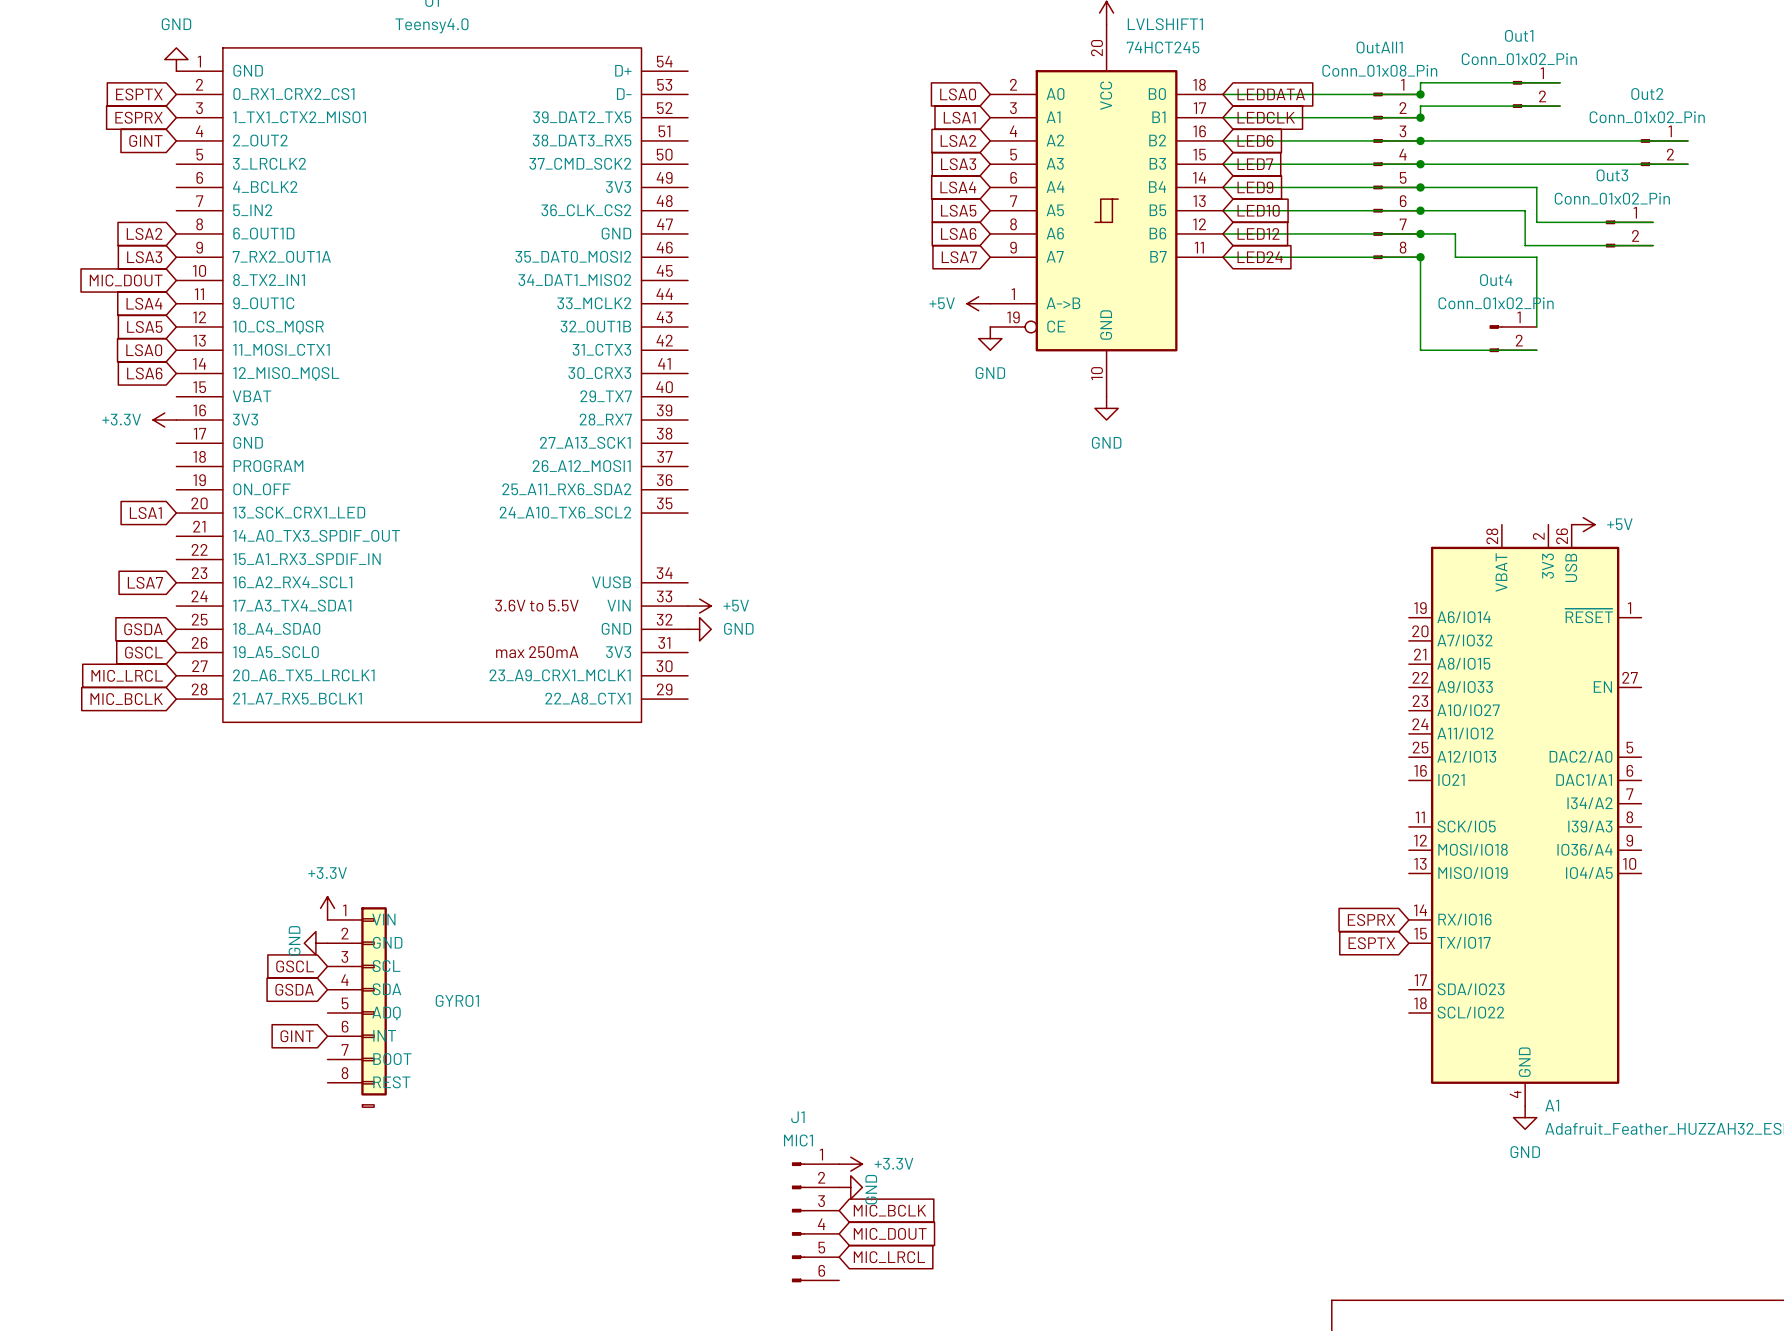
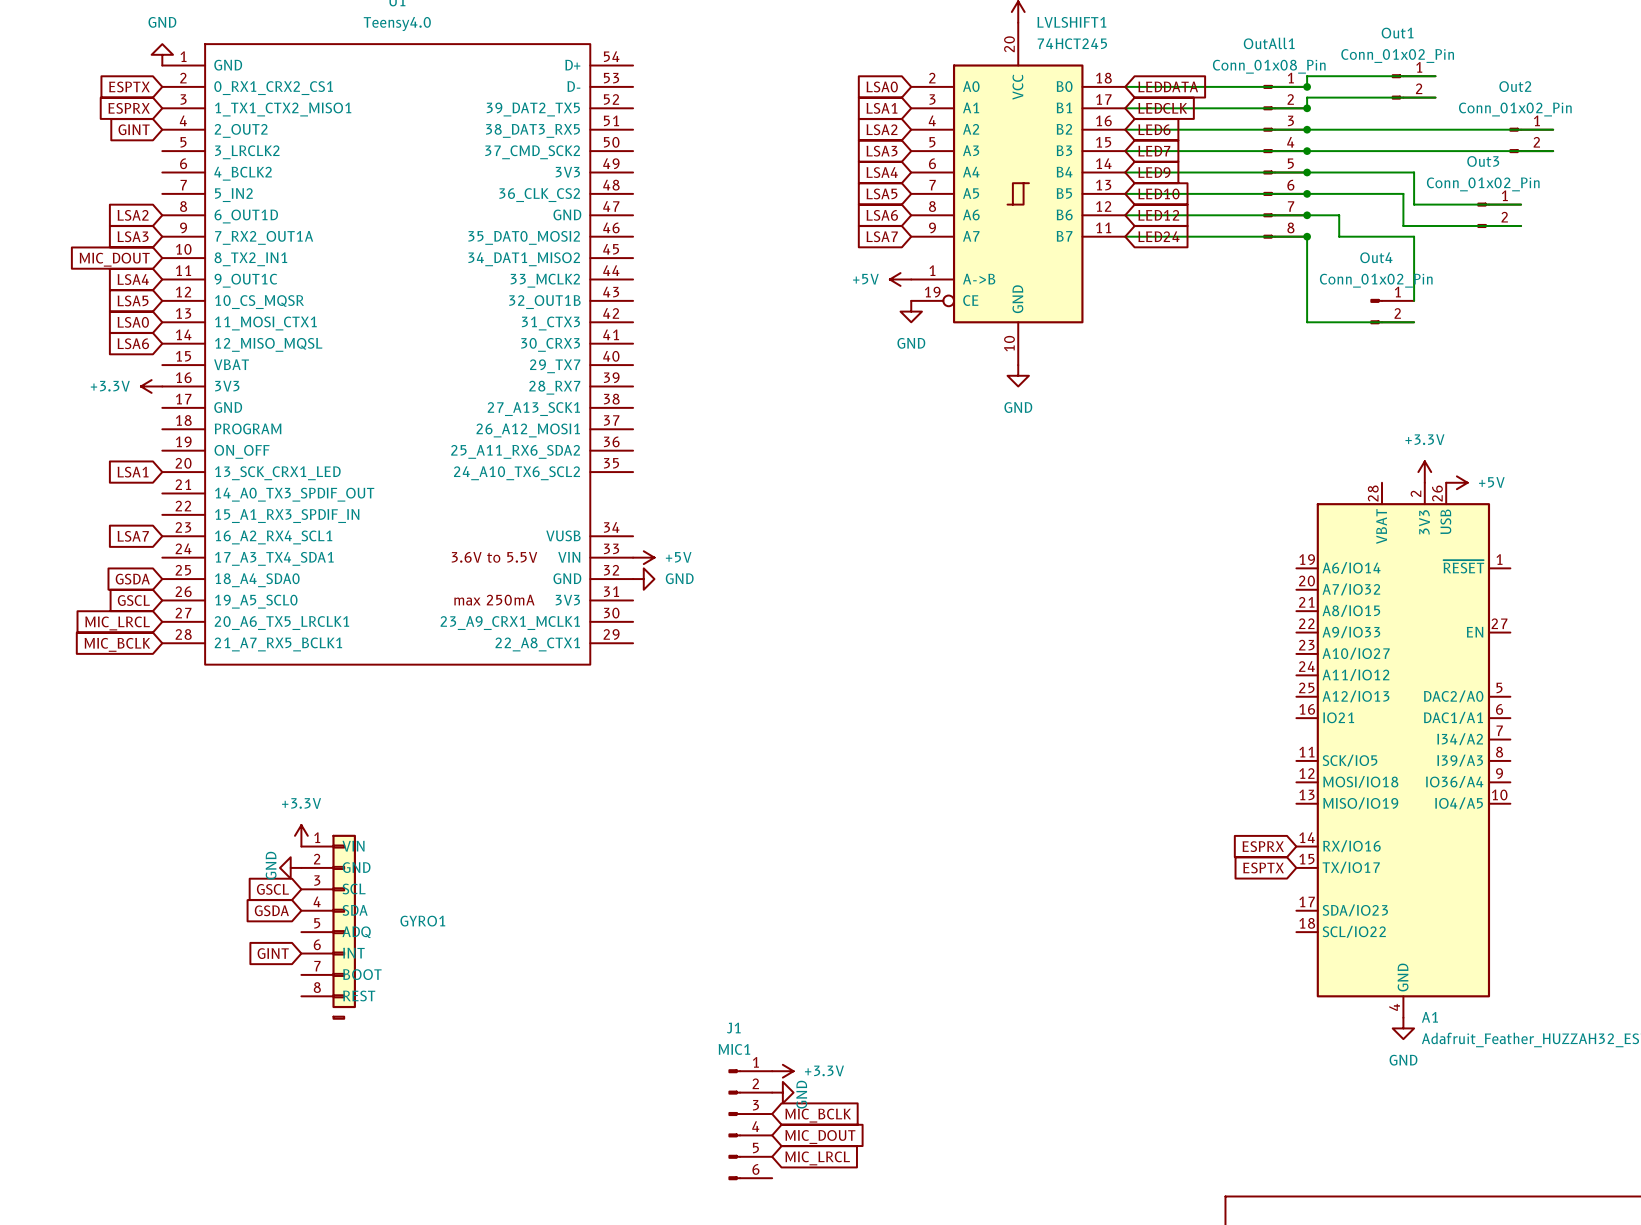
power symbol: none -> +3.3V (1424, 472)

